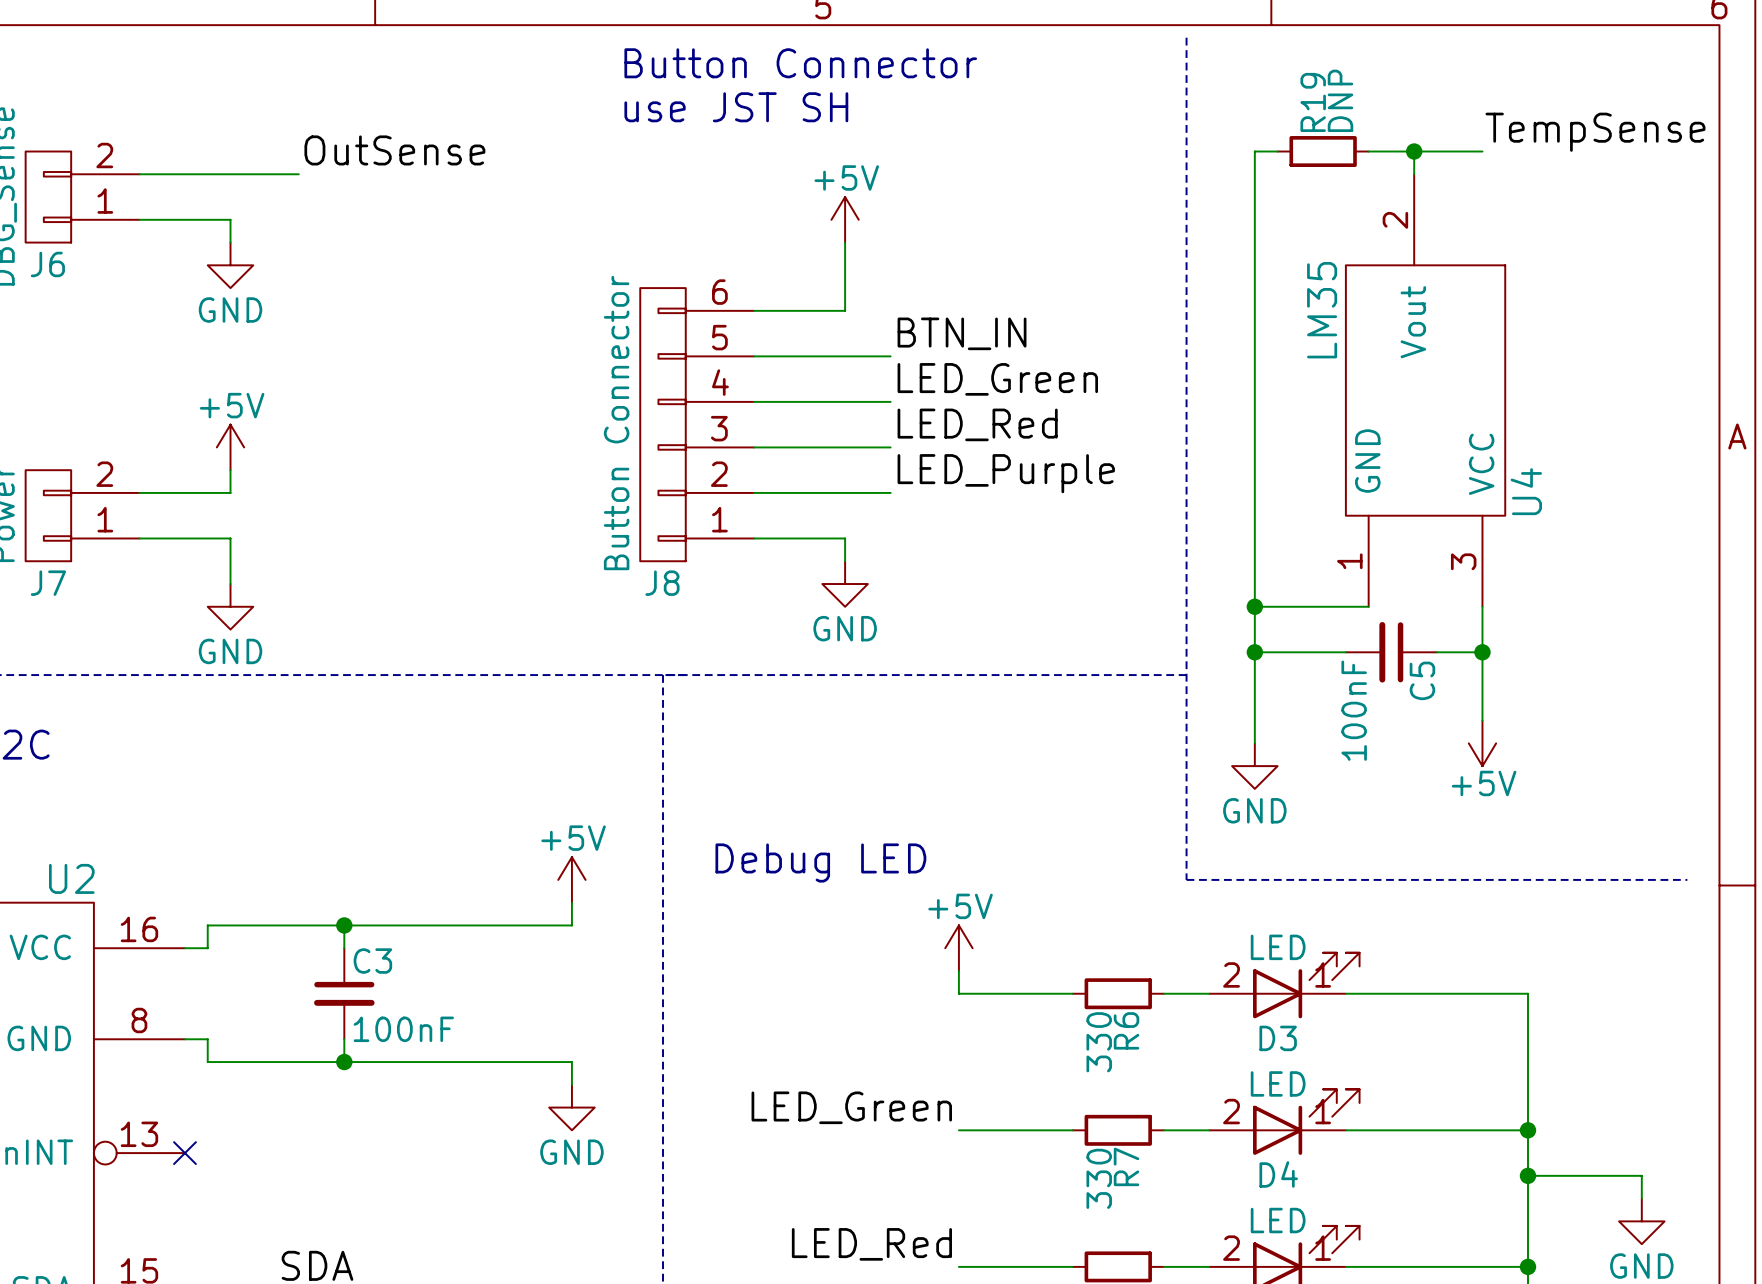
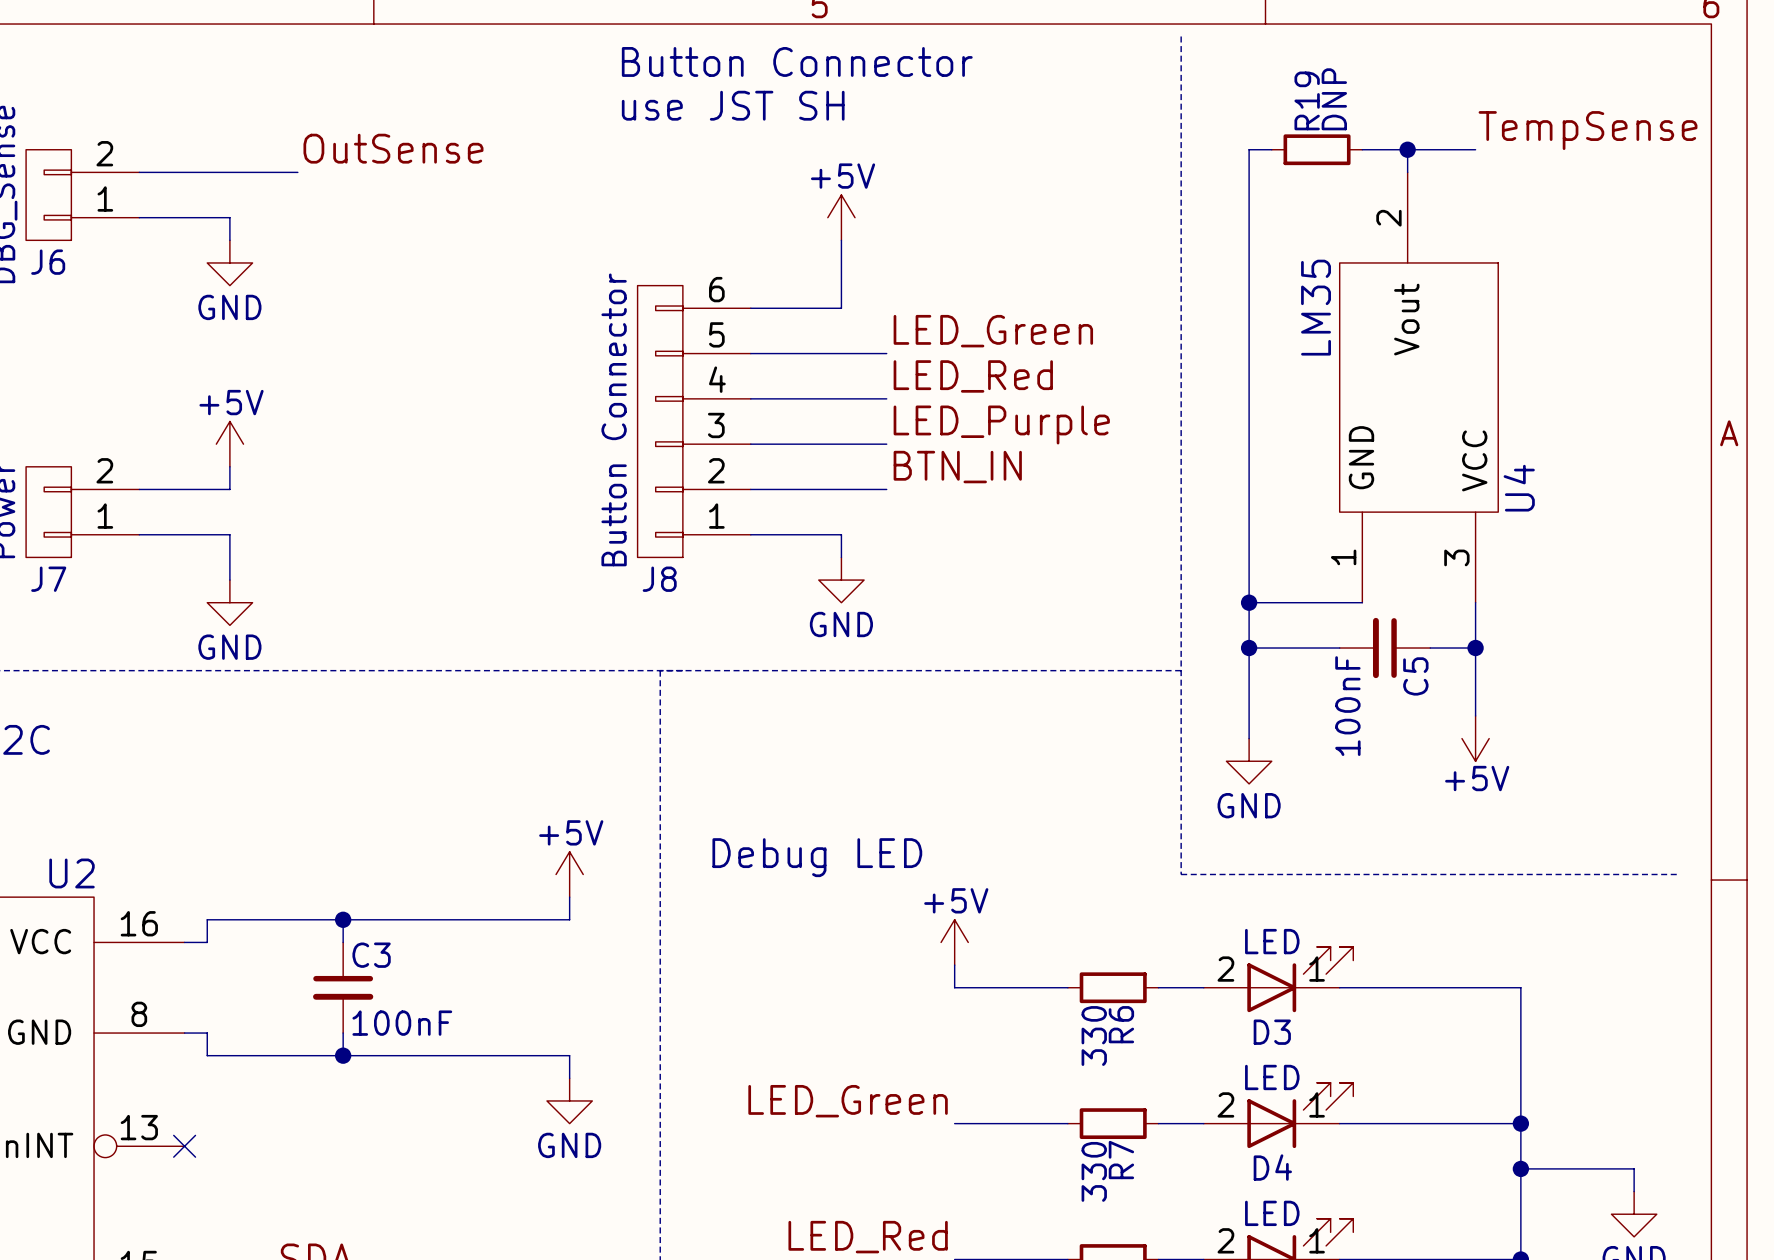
label: BTN_IN (962, 333) -> LED_Green (993, 331)
label: LED_Green (997, 379) -> LED_Red (973, 376)
label: LED_Red (977, 424) -> LED_Purple (1001, 424)
label: LED_Purple (1006, 473) -> BTN_IN (957, 467)

